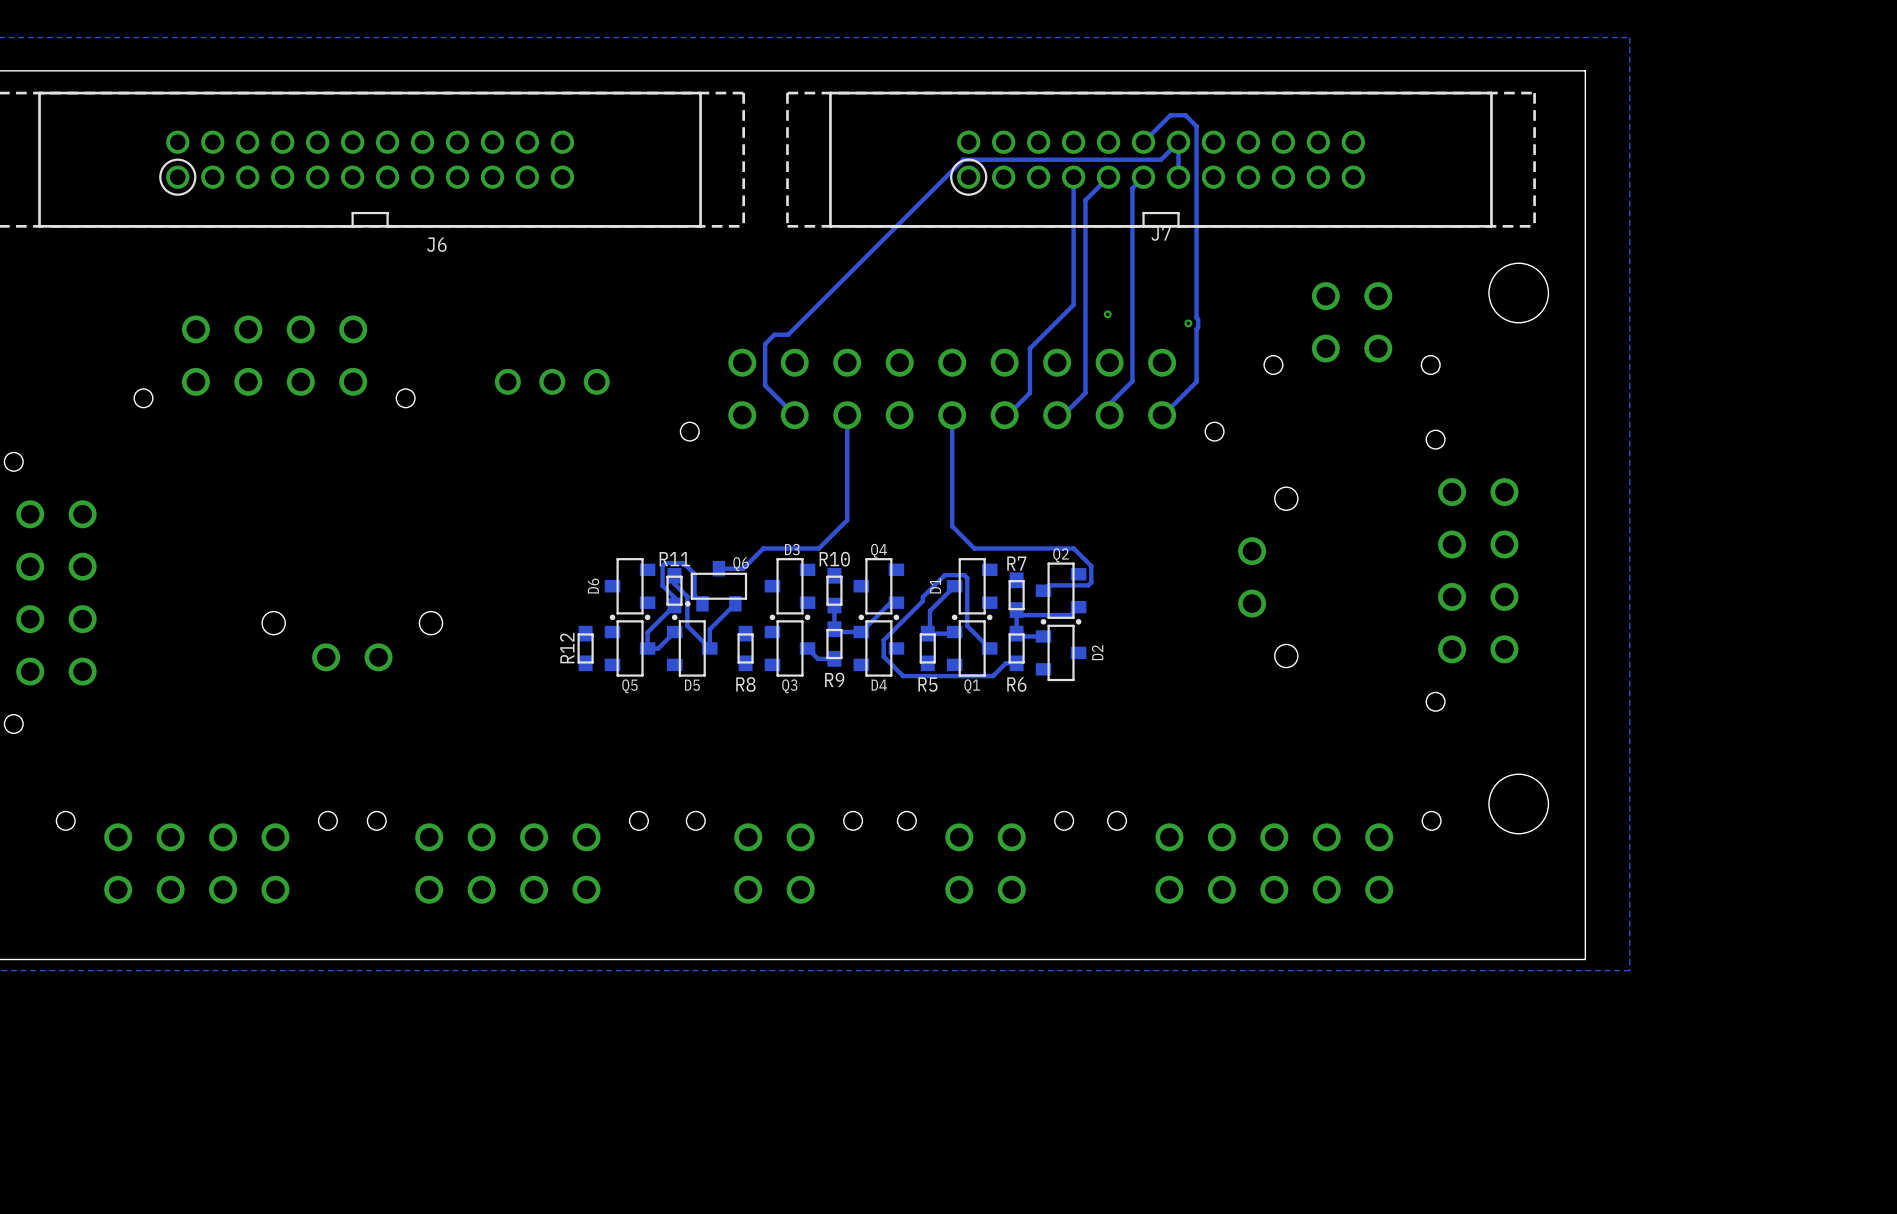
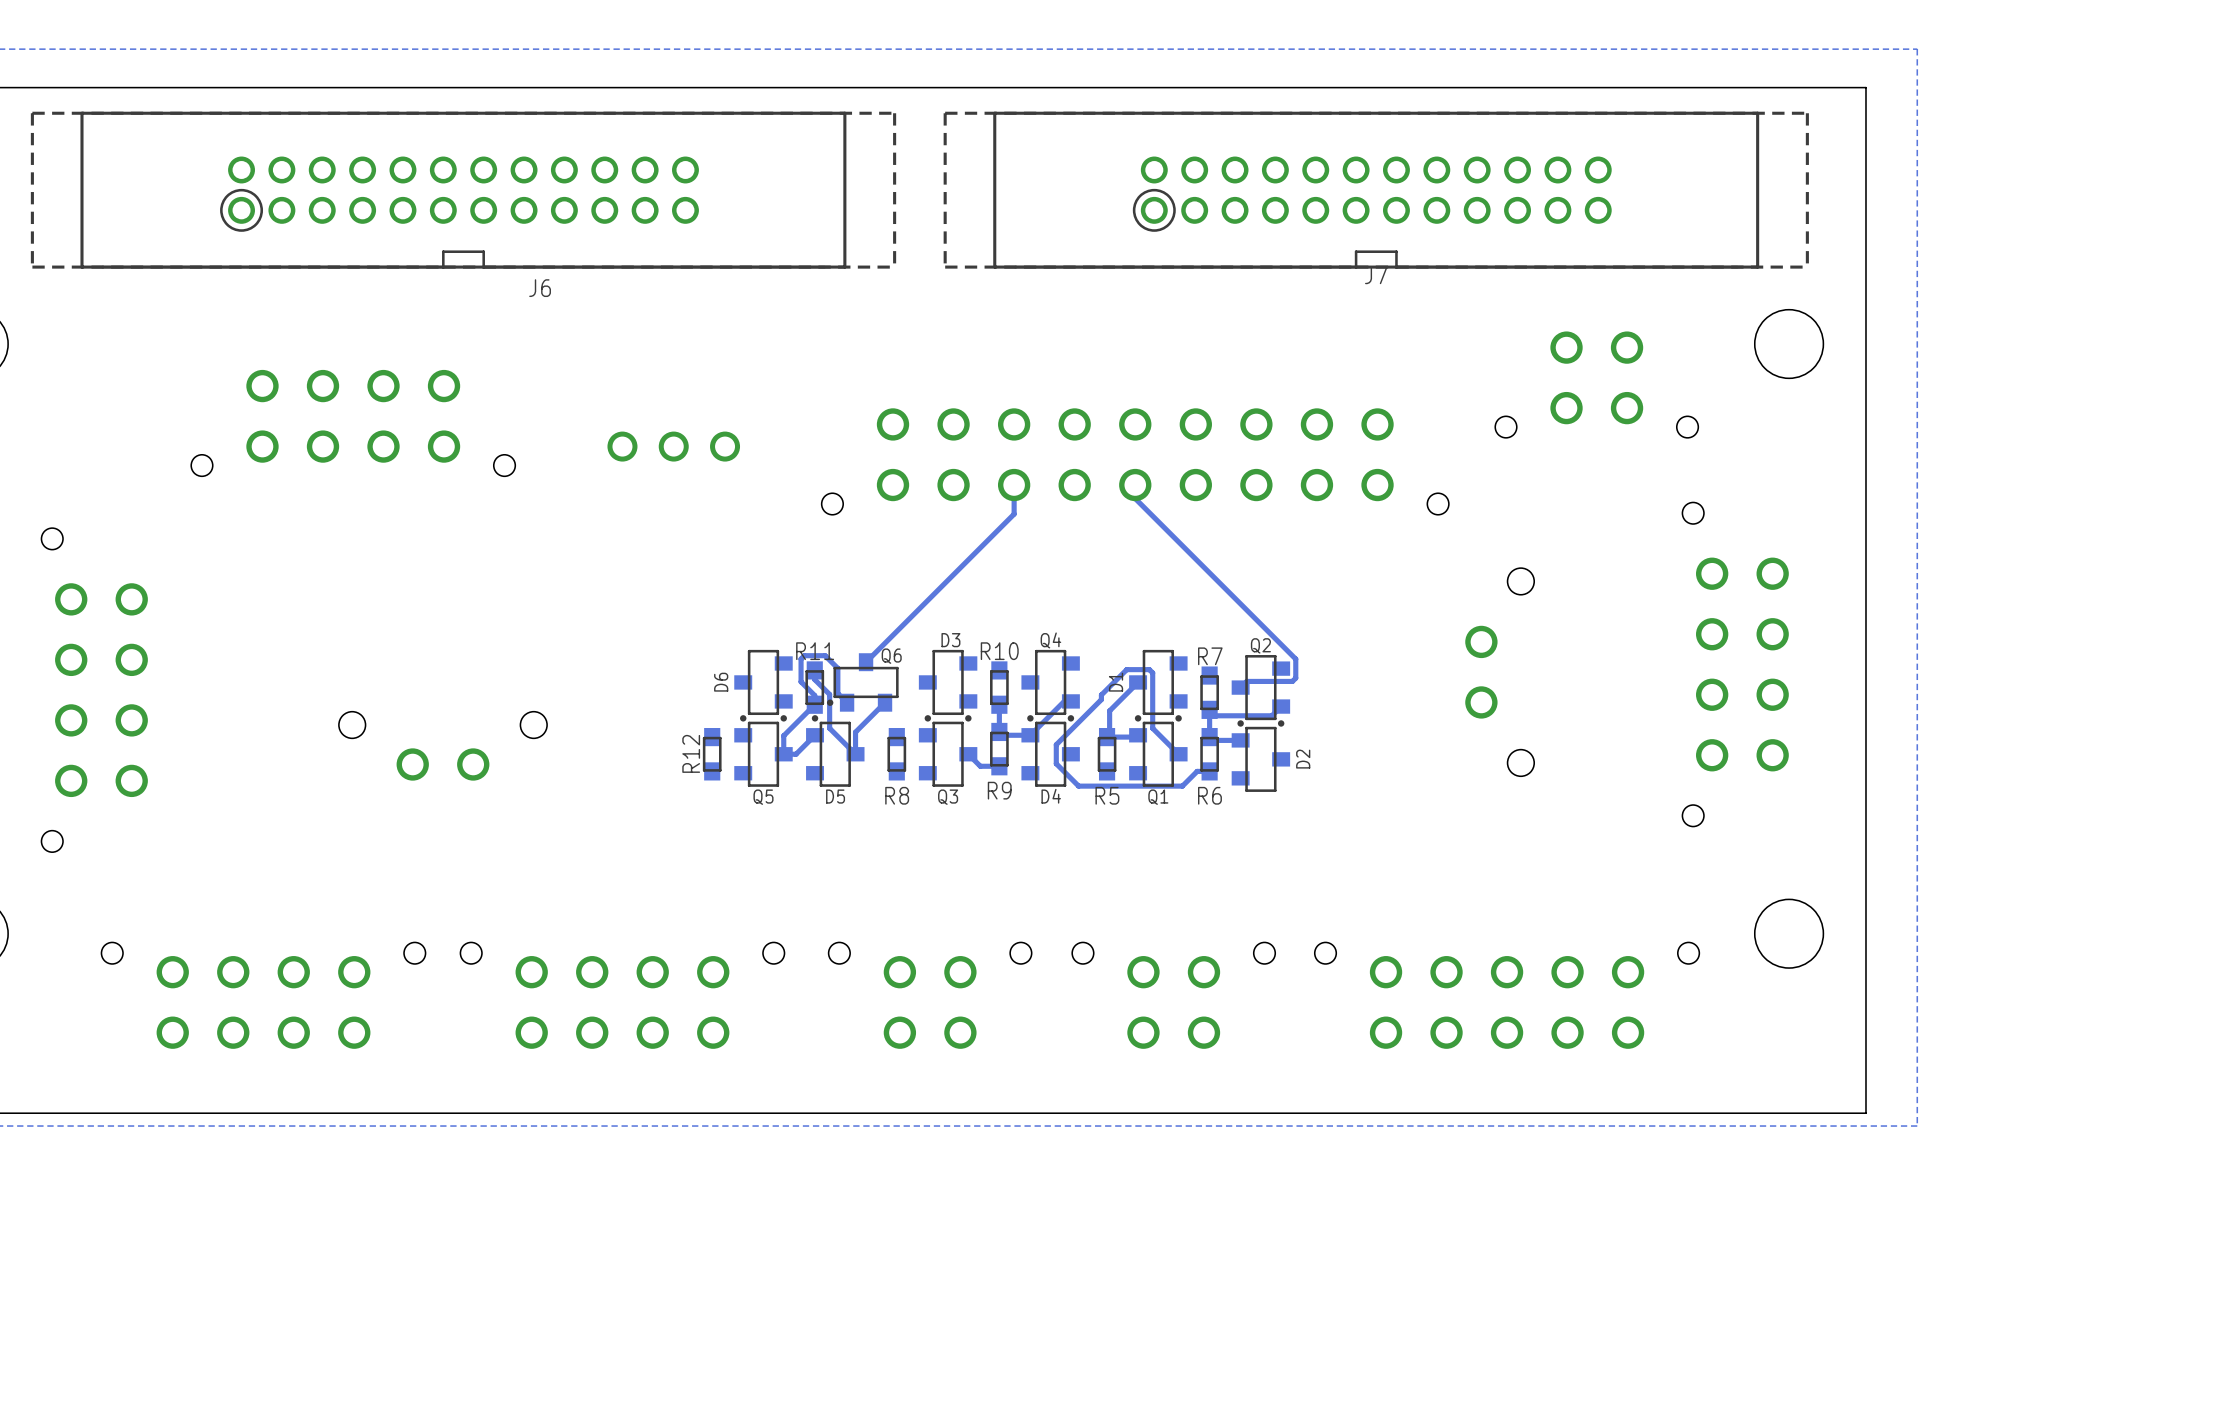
track: (1143, 142) (1170, 115) (1185, 115) (1196, 126) (1196, 317) (1198, 319) (1196, 381) (1162, 415) -> none
track: (1073, 177) (1073, 304) (1029, 348) (1029, 392) (1007, 415) (1004, 415) -> none
track: (1108, 177) (1085, 200) (1085, 392) (1063, 415) (1057, 415) -> none
track: (1143, 177) (1132, 188) (1132, 381) (1109, 404) (1109, 415) -> none
track: (1178, 177) (1178, 142) (1161, 159) (963, 159) (788, 334) (774, 334) (765, 343) (765, 385) (794, 415) -> none
via: (1107, 314) -> none
via: (1188, 323) -> none
track: (952, 426) (952, 526) (974, 548) (1073, 548) -> (1135, 498) (1275, 638)
track: (847, 440) (847, 520) (818, 548) (763, 548) (743, 568) (718, 568) -> (1014, 514) (866, 662)

